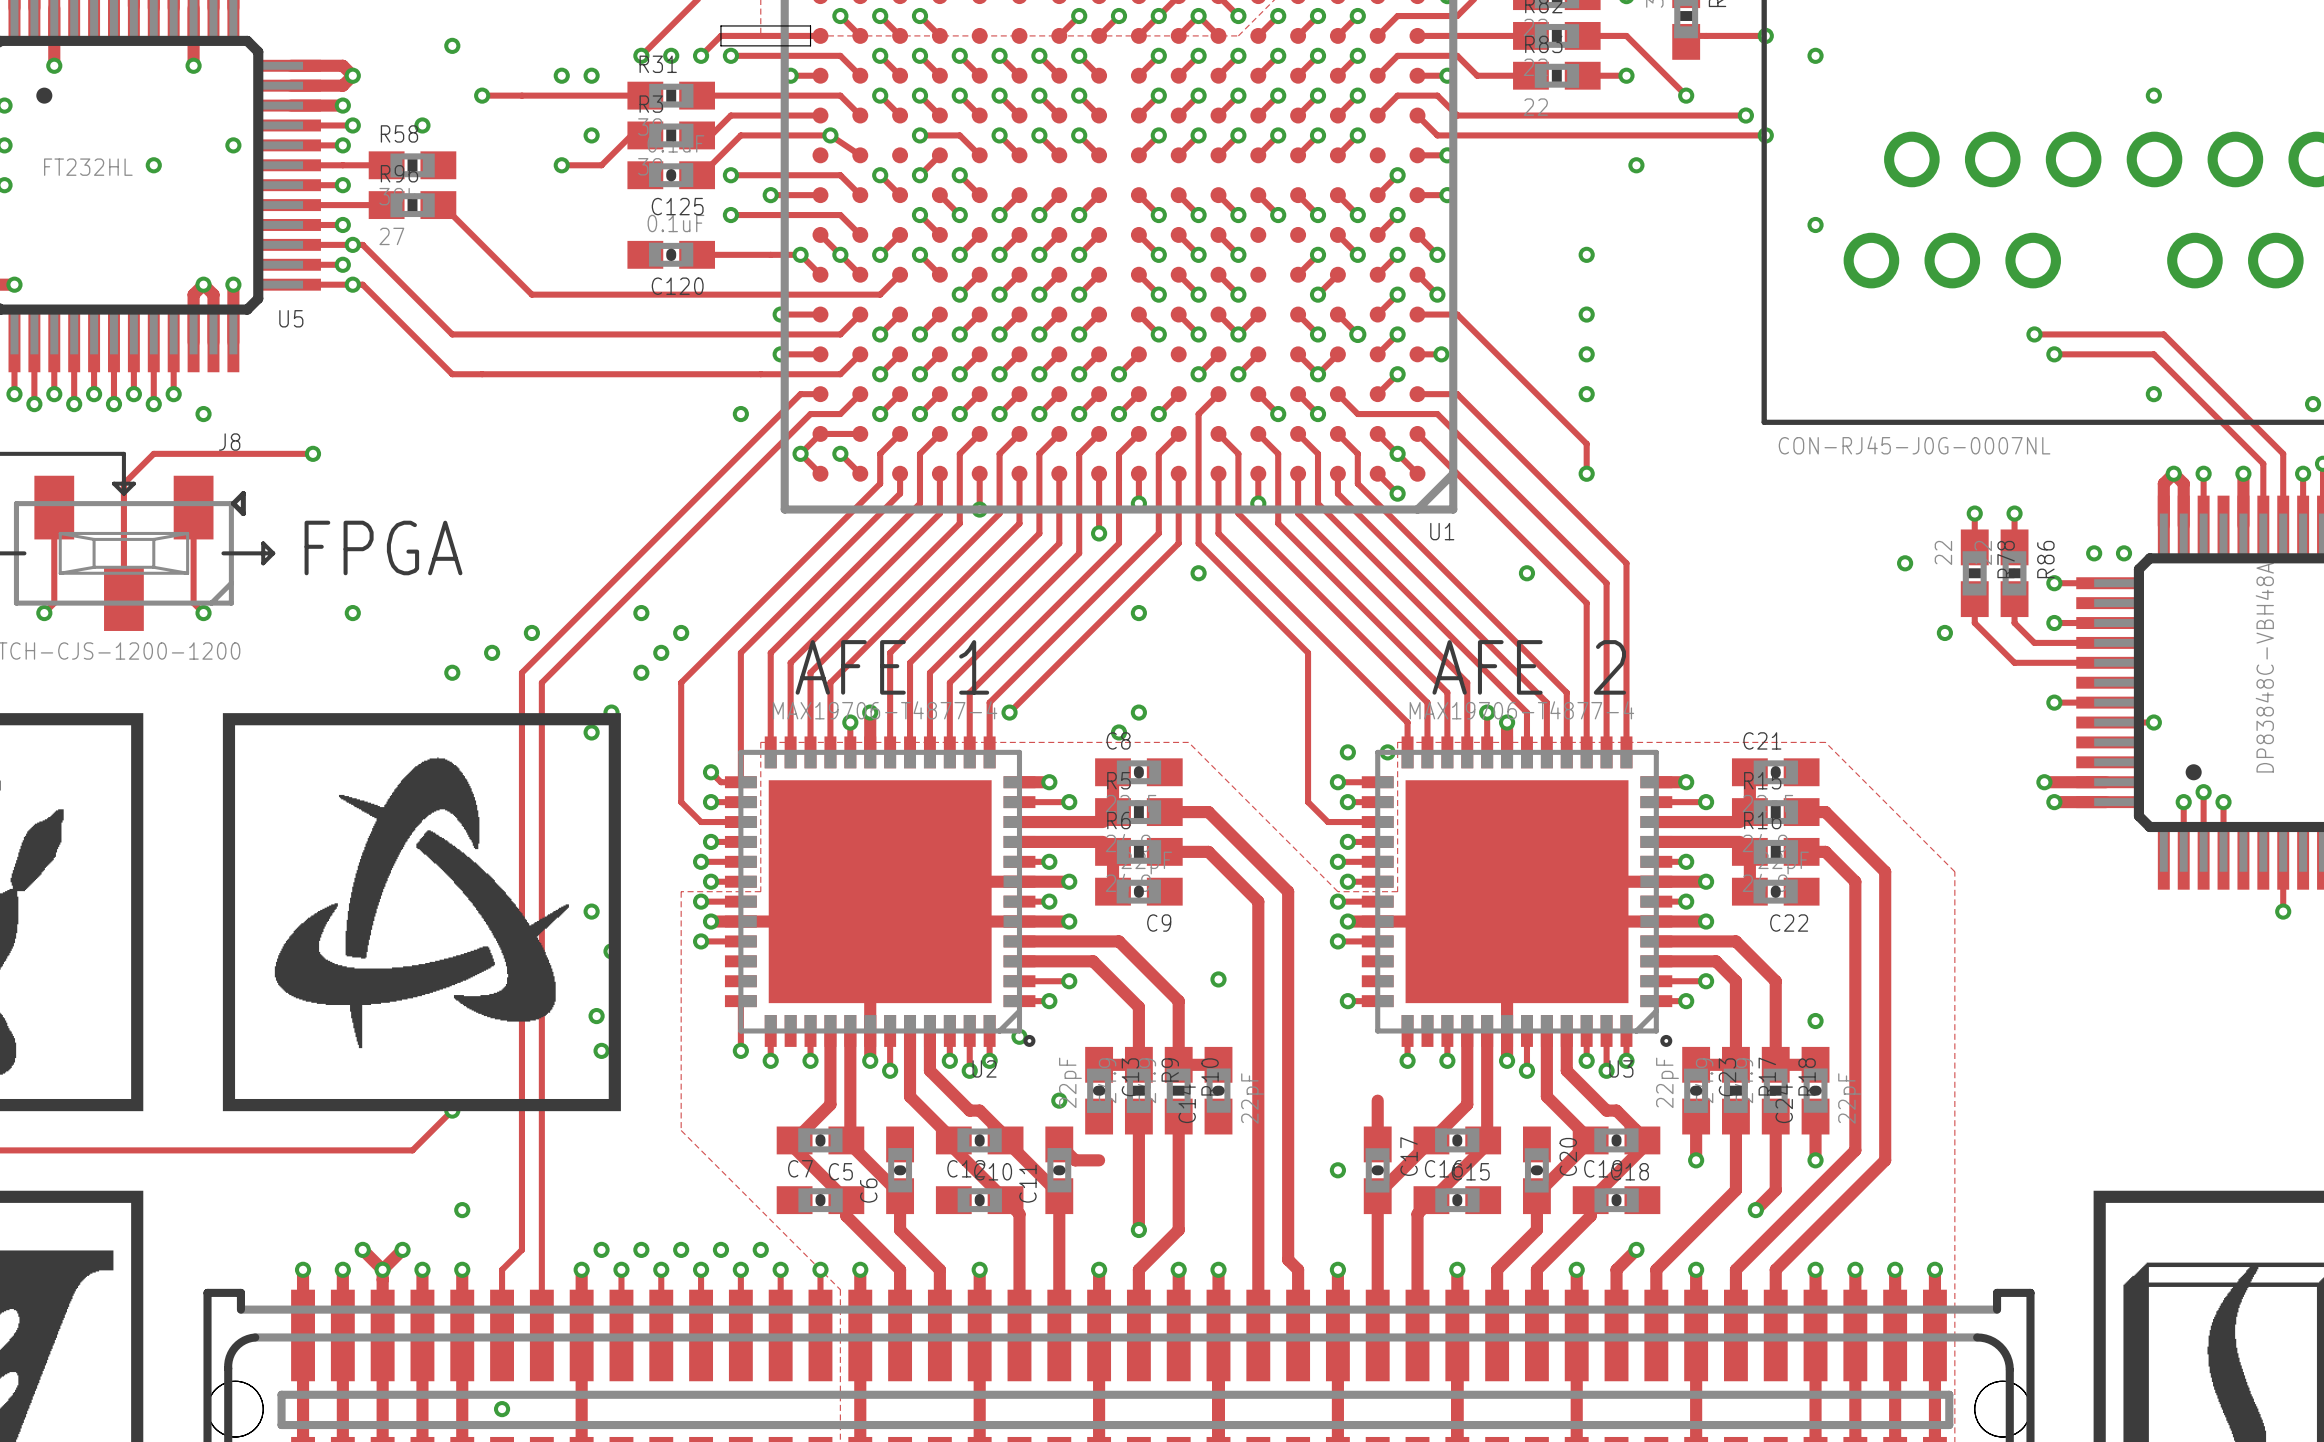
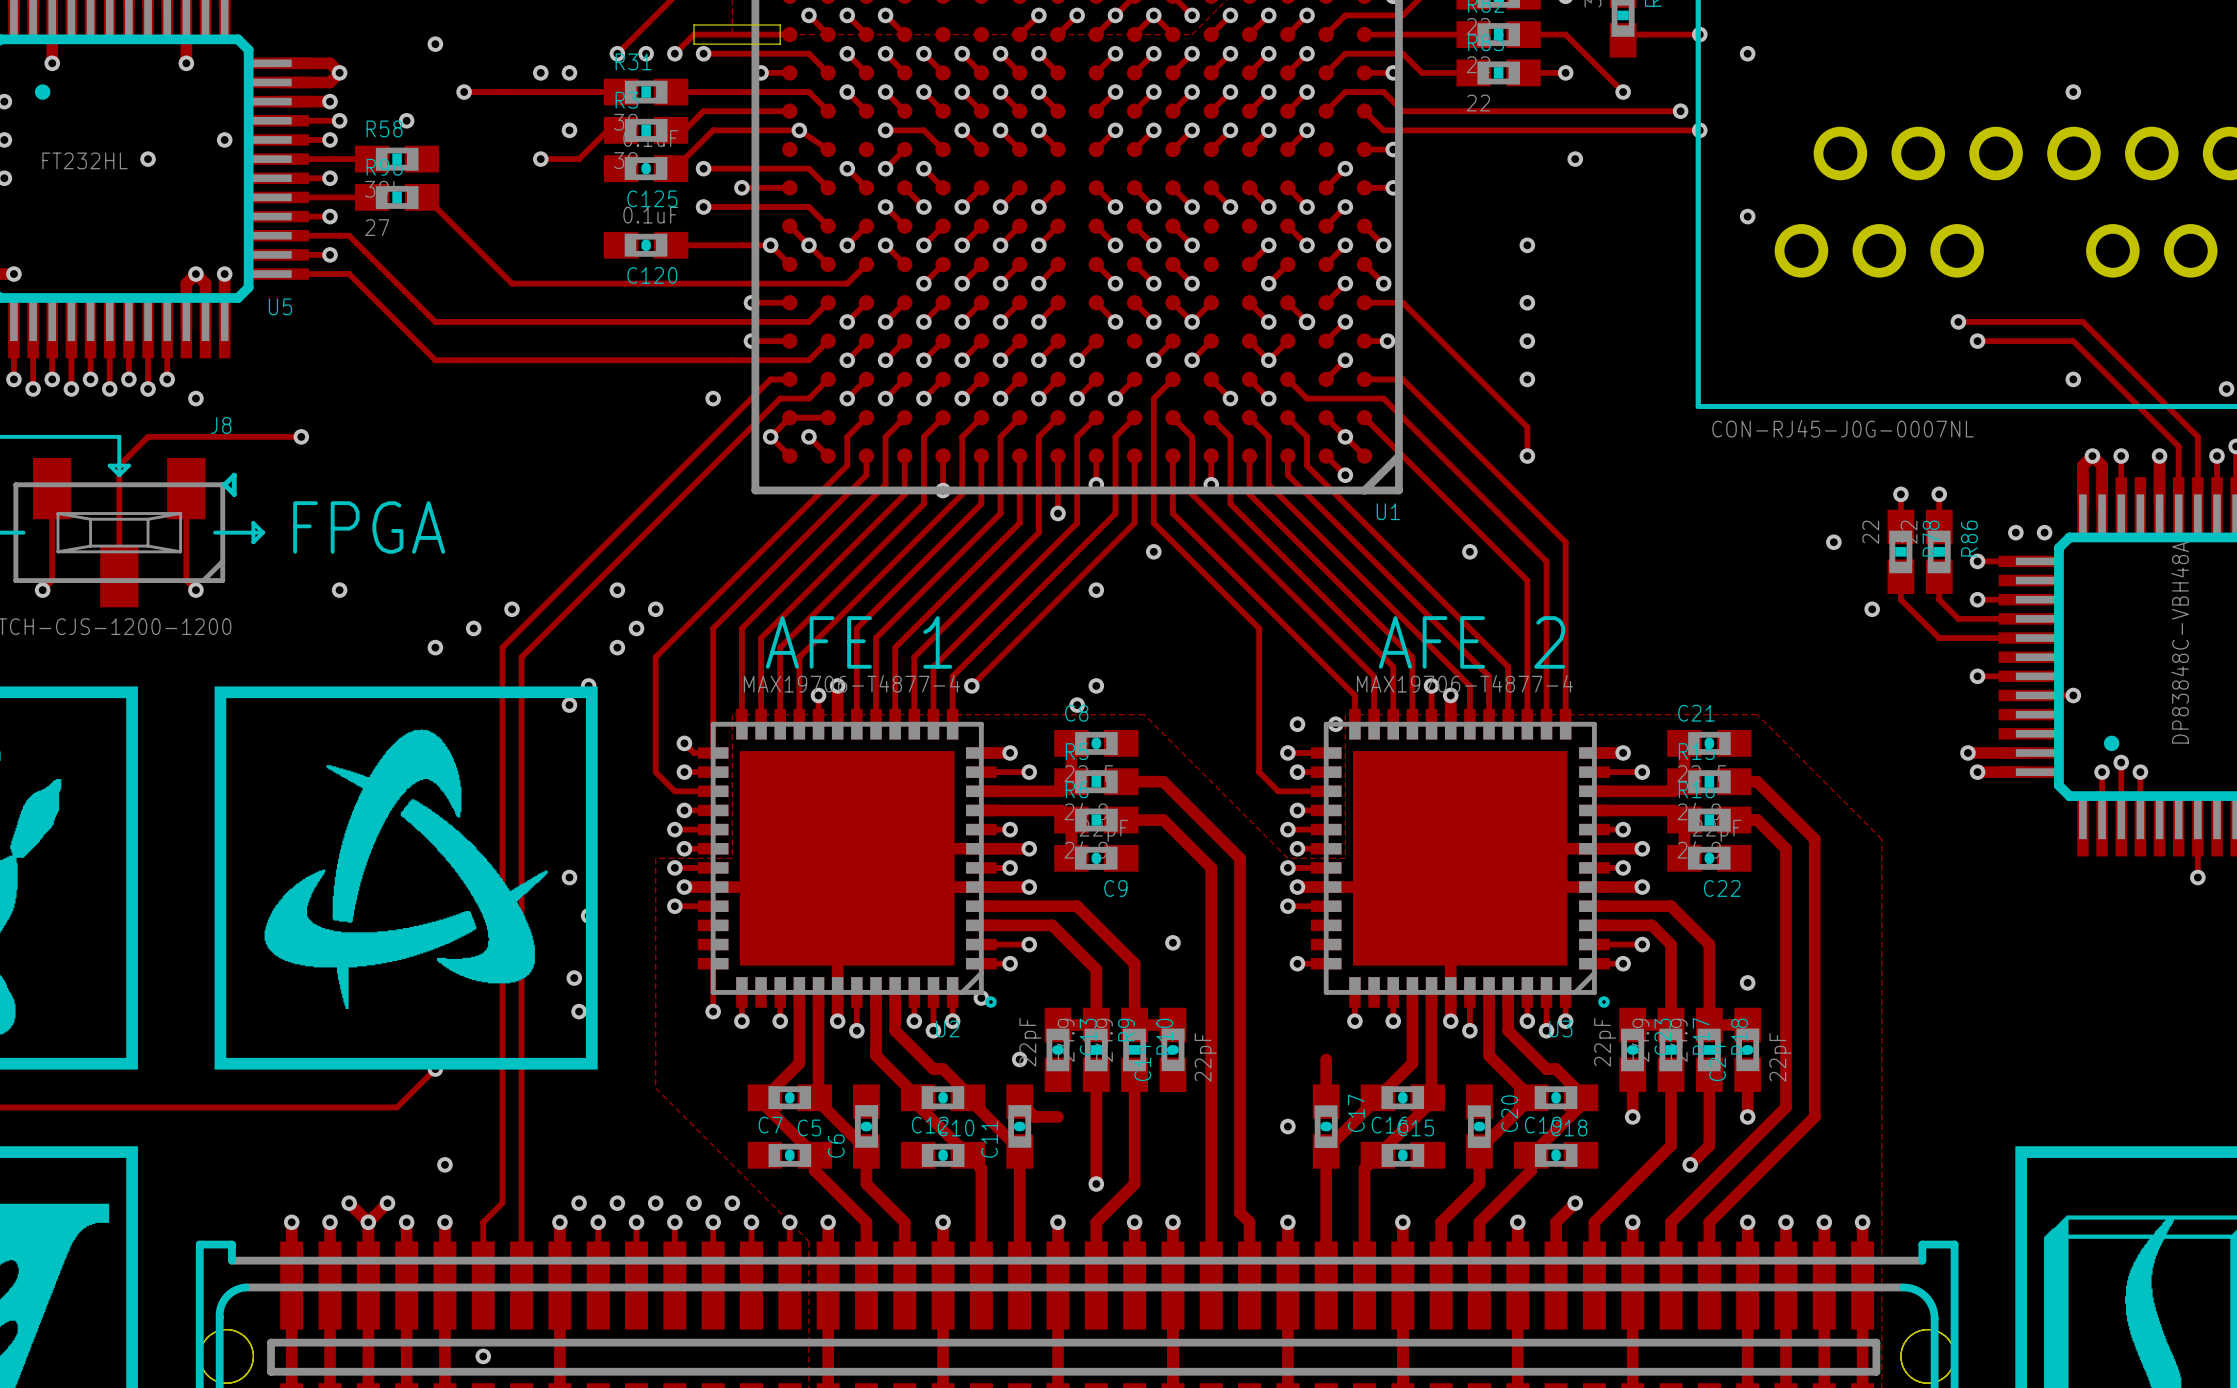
via: (352, 244) -> none
via: (352, 284) -> none

